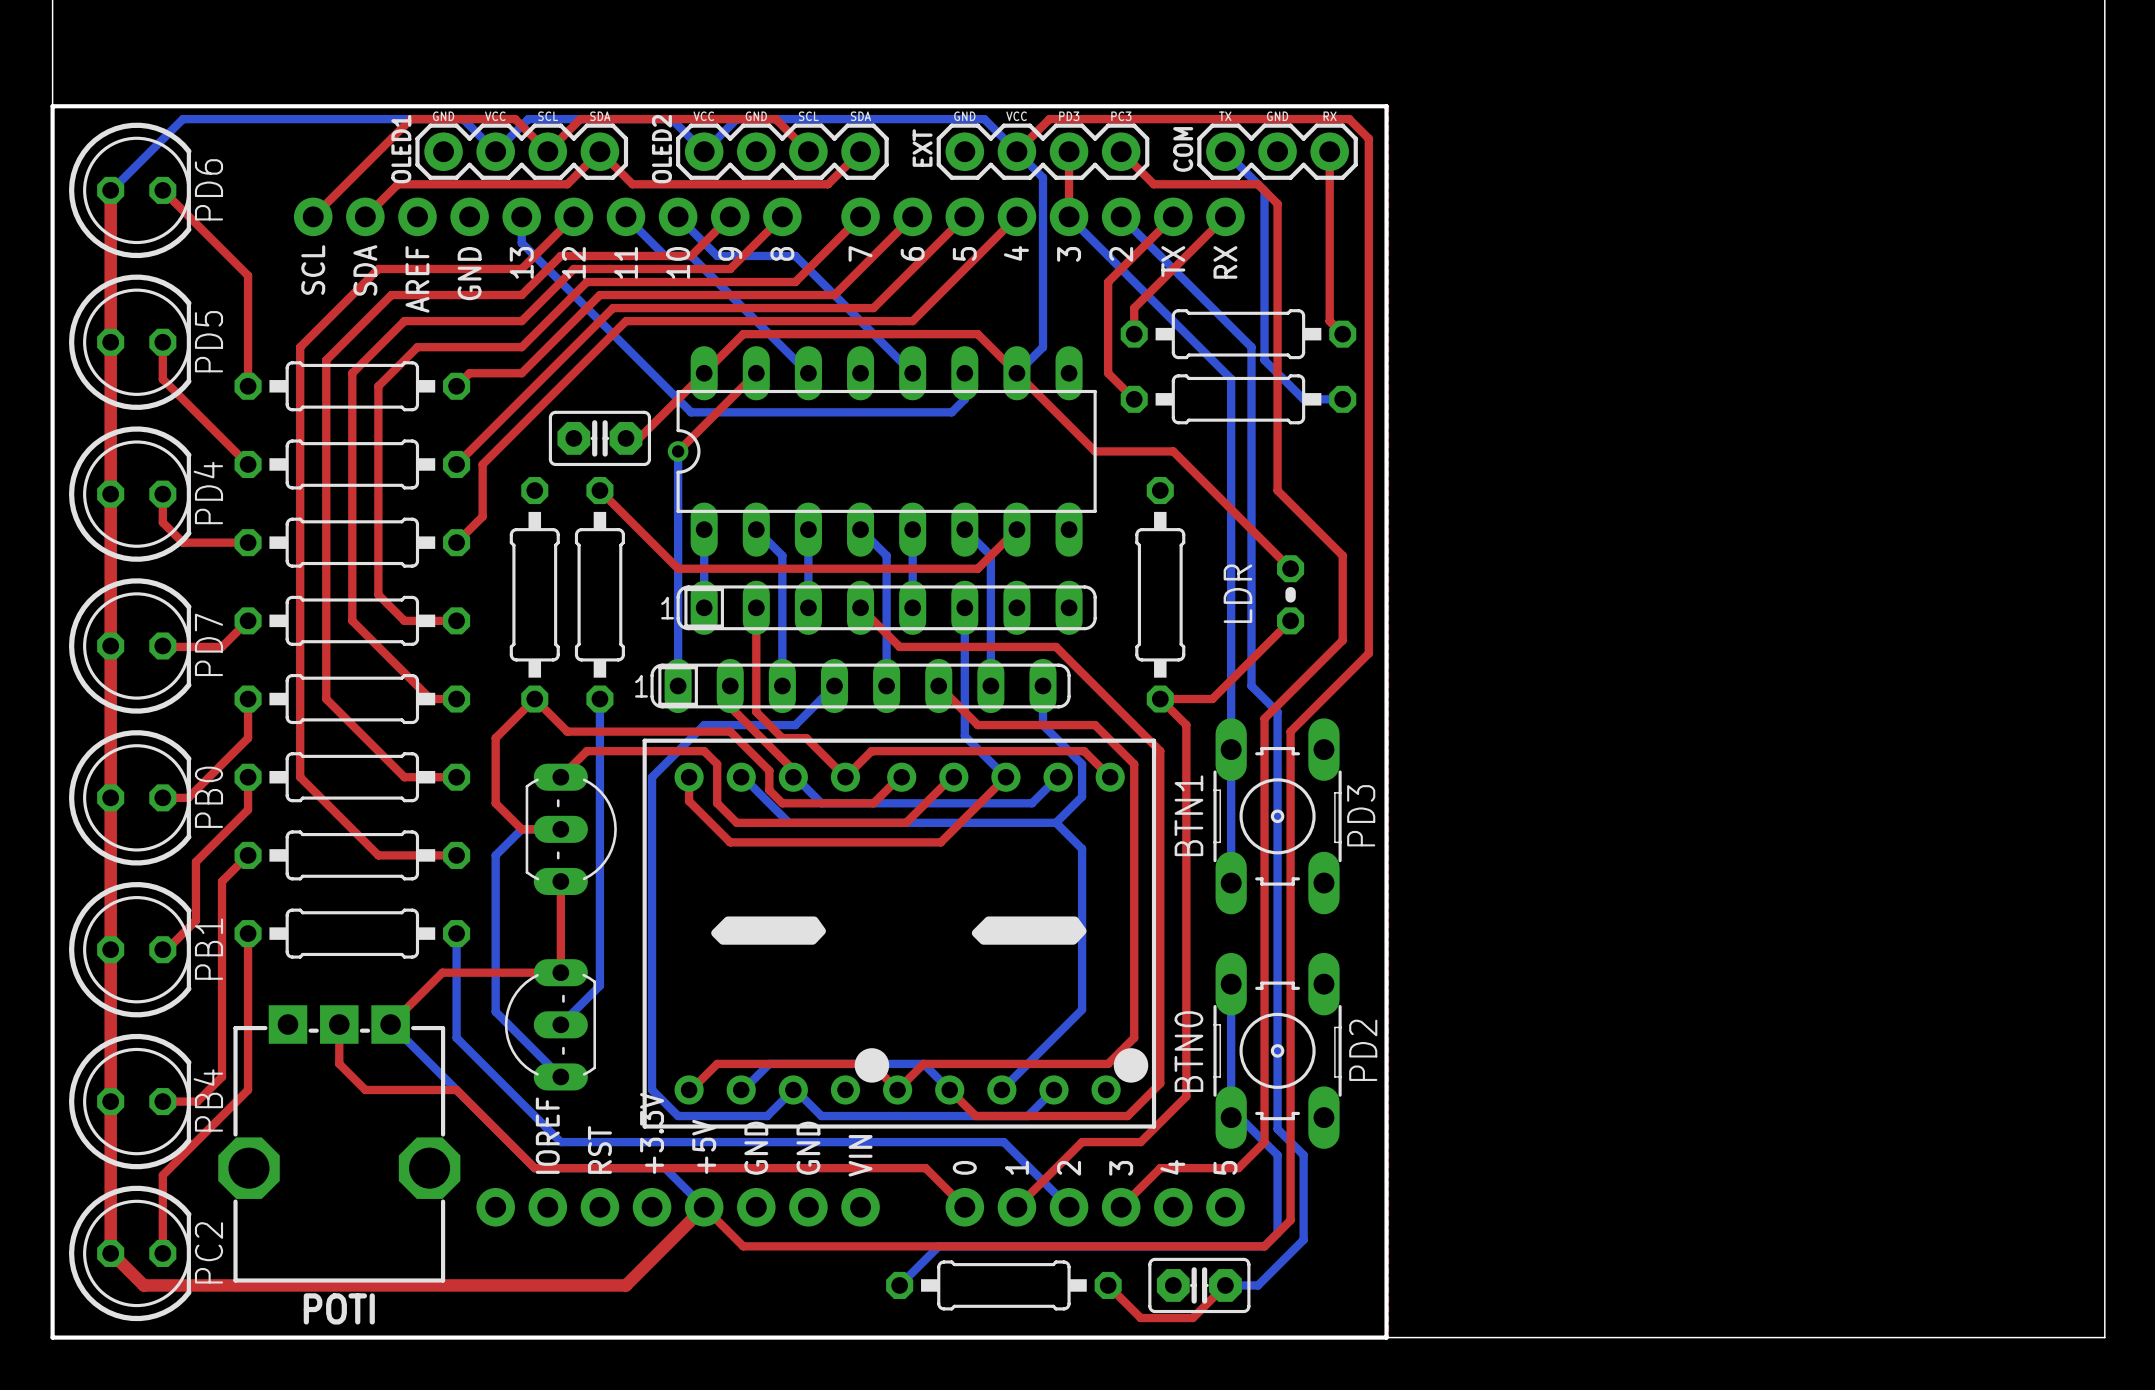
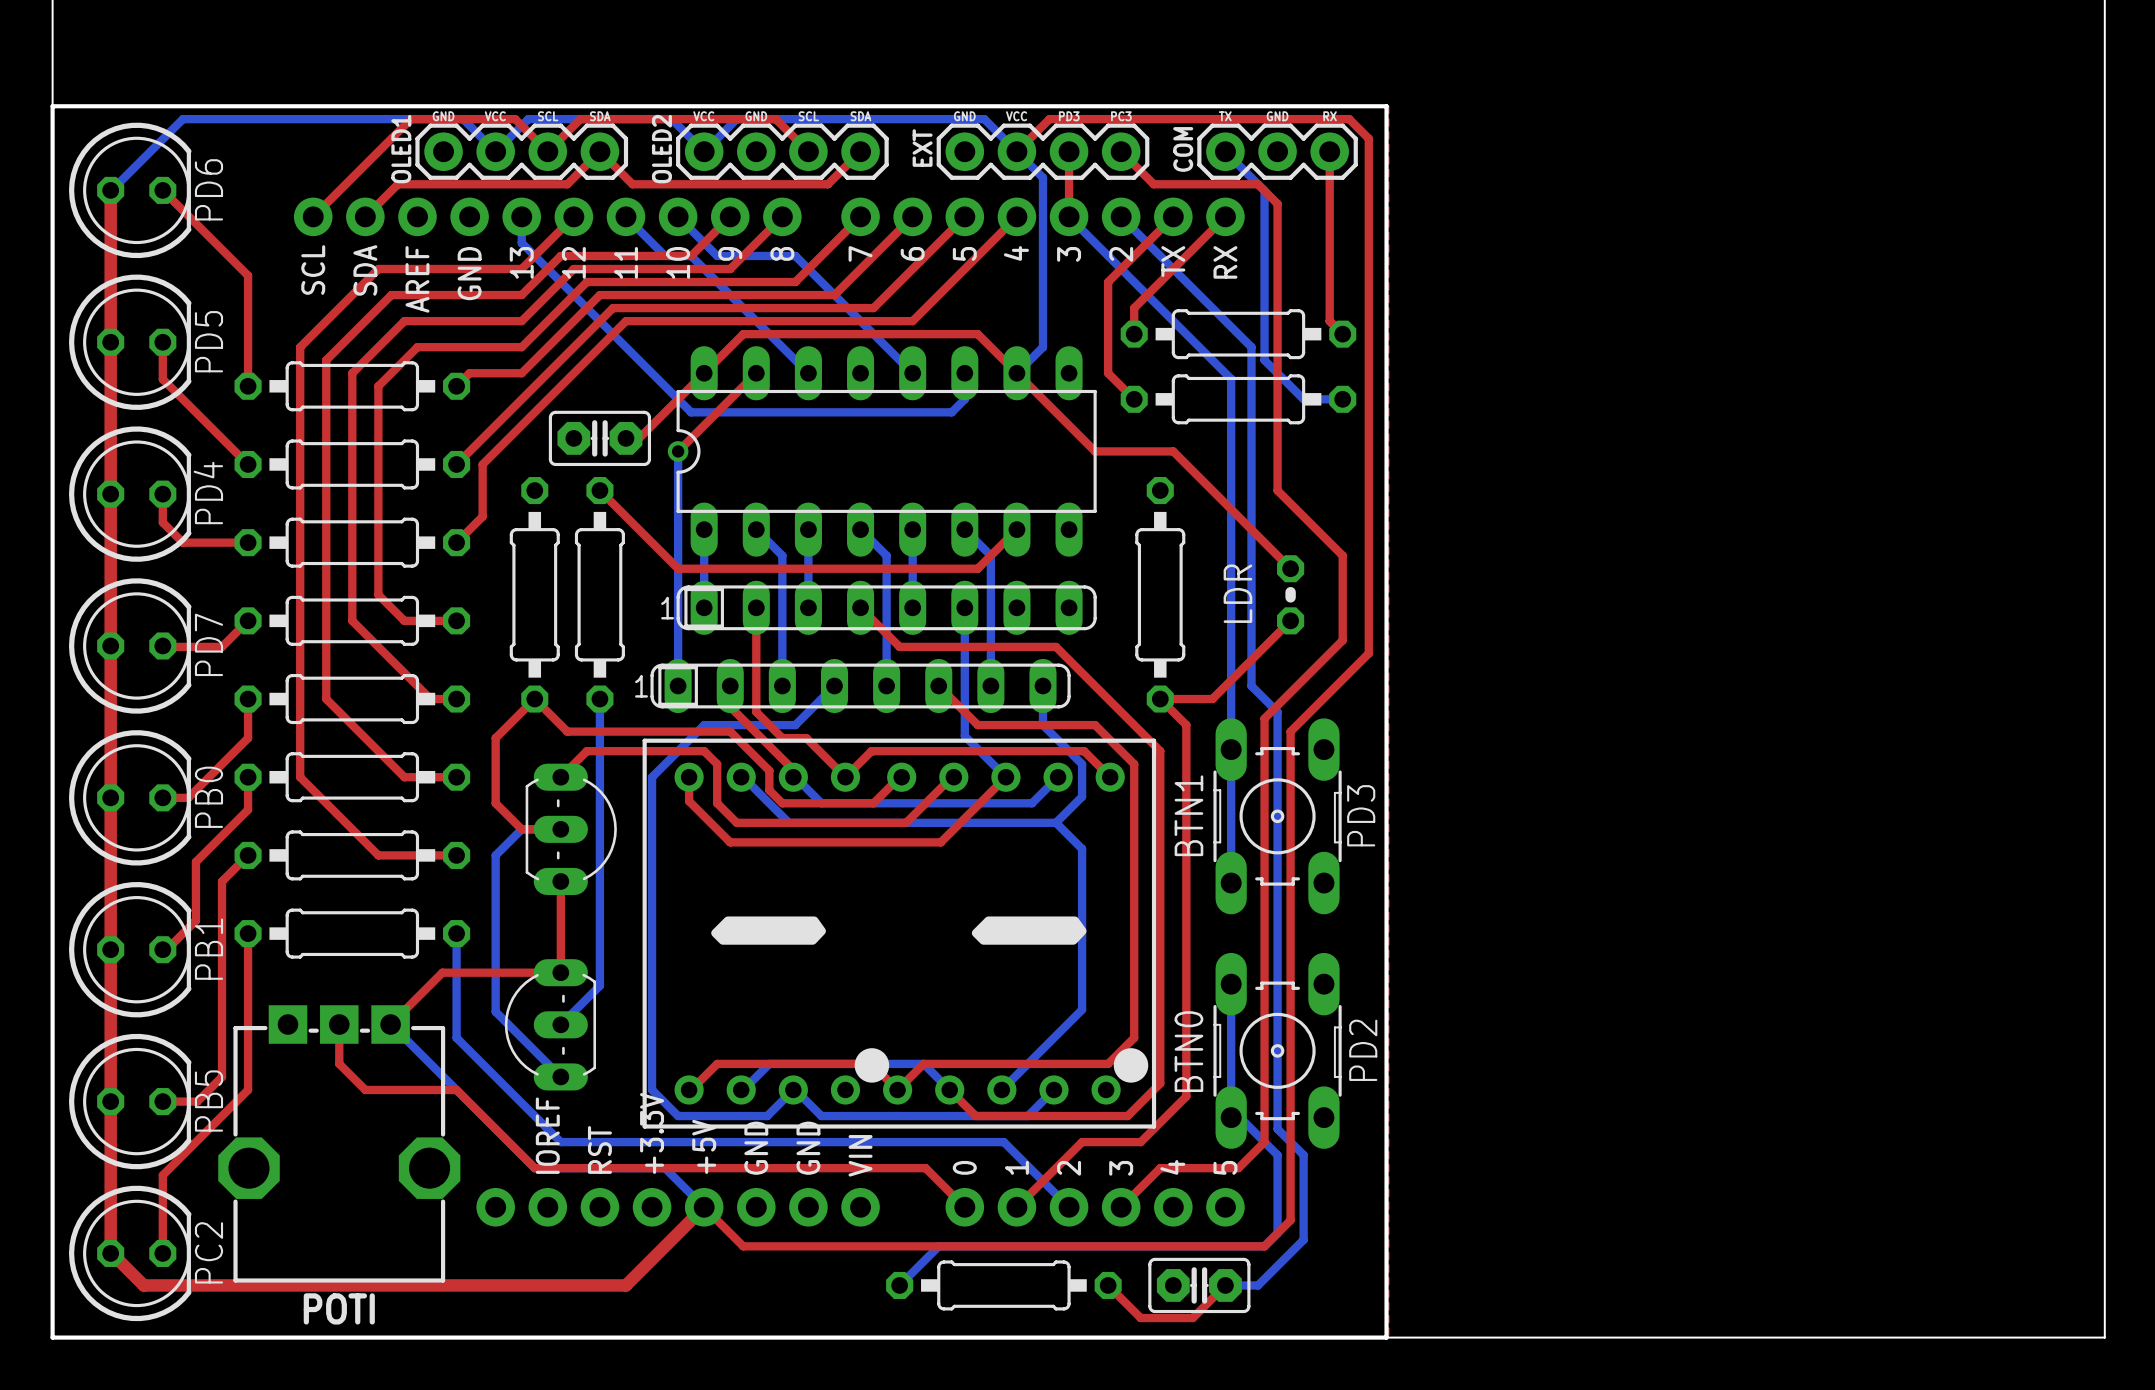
text: PB4 (208, 1100) -> PB5 (208, 1101)

